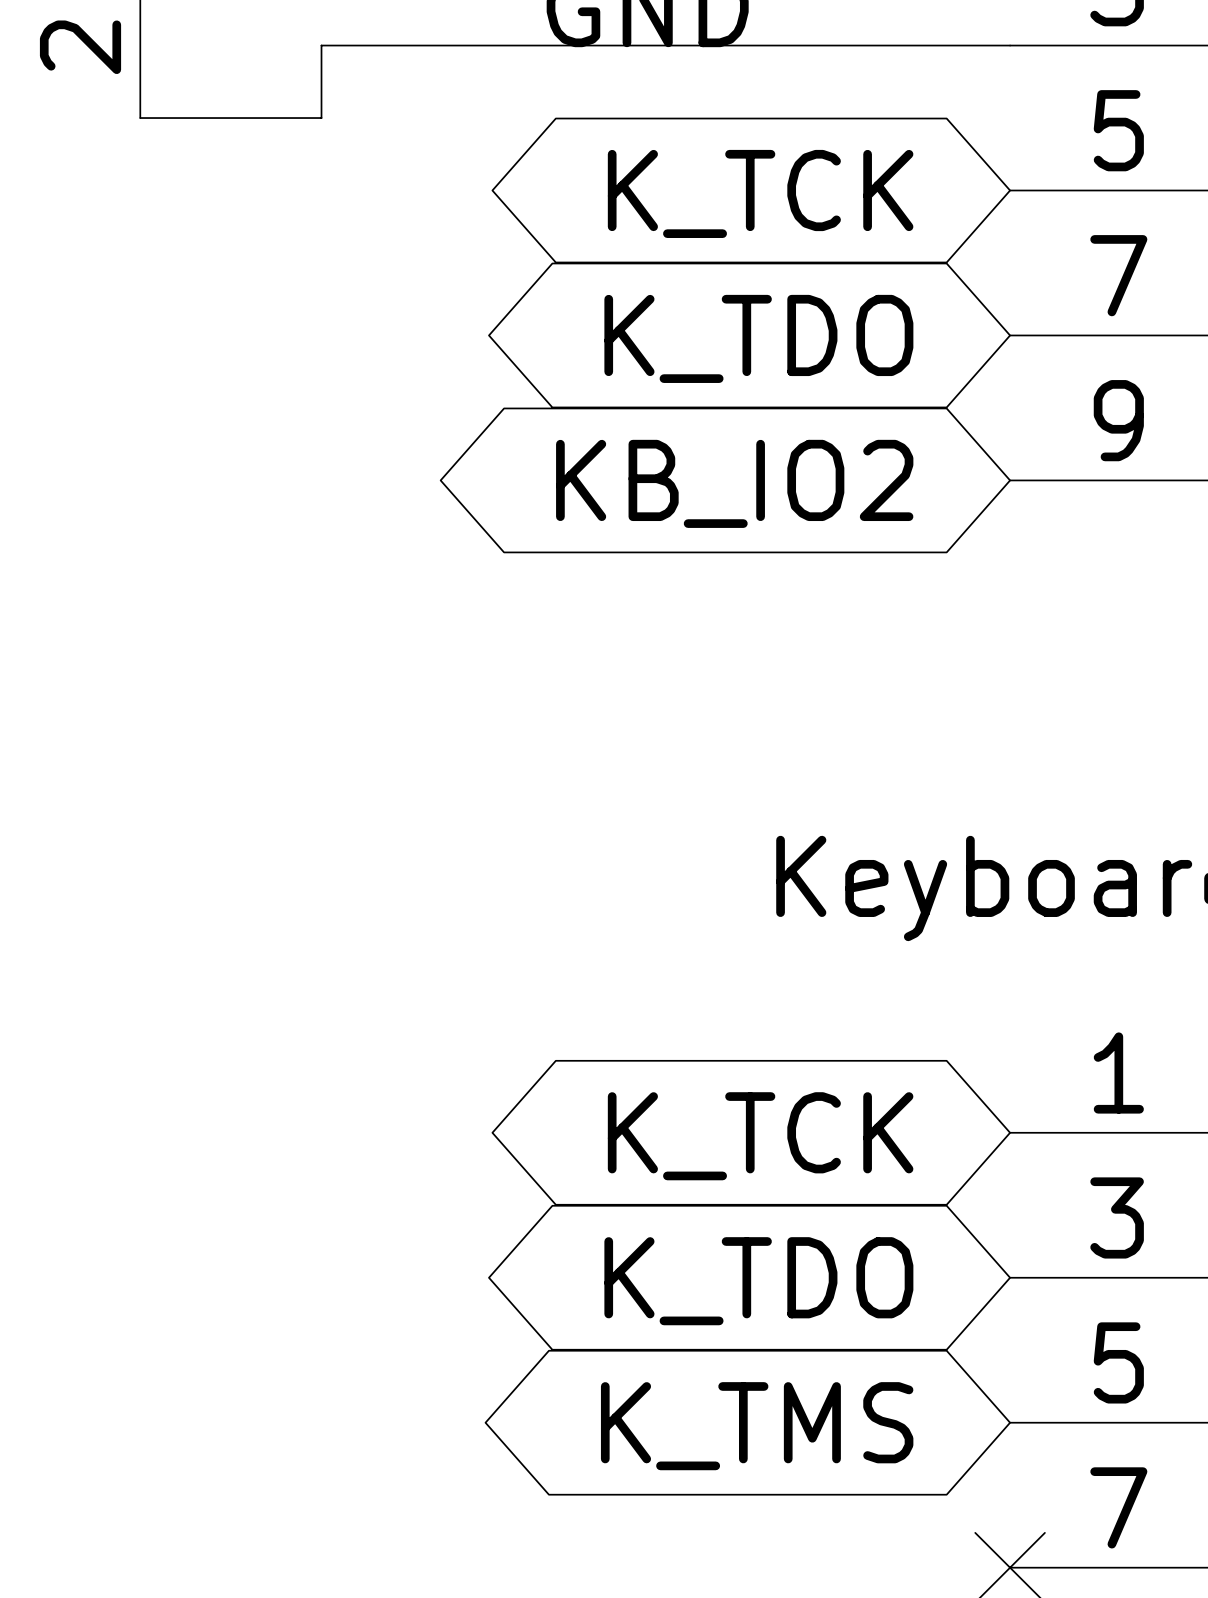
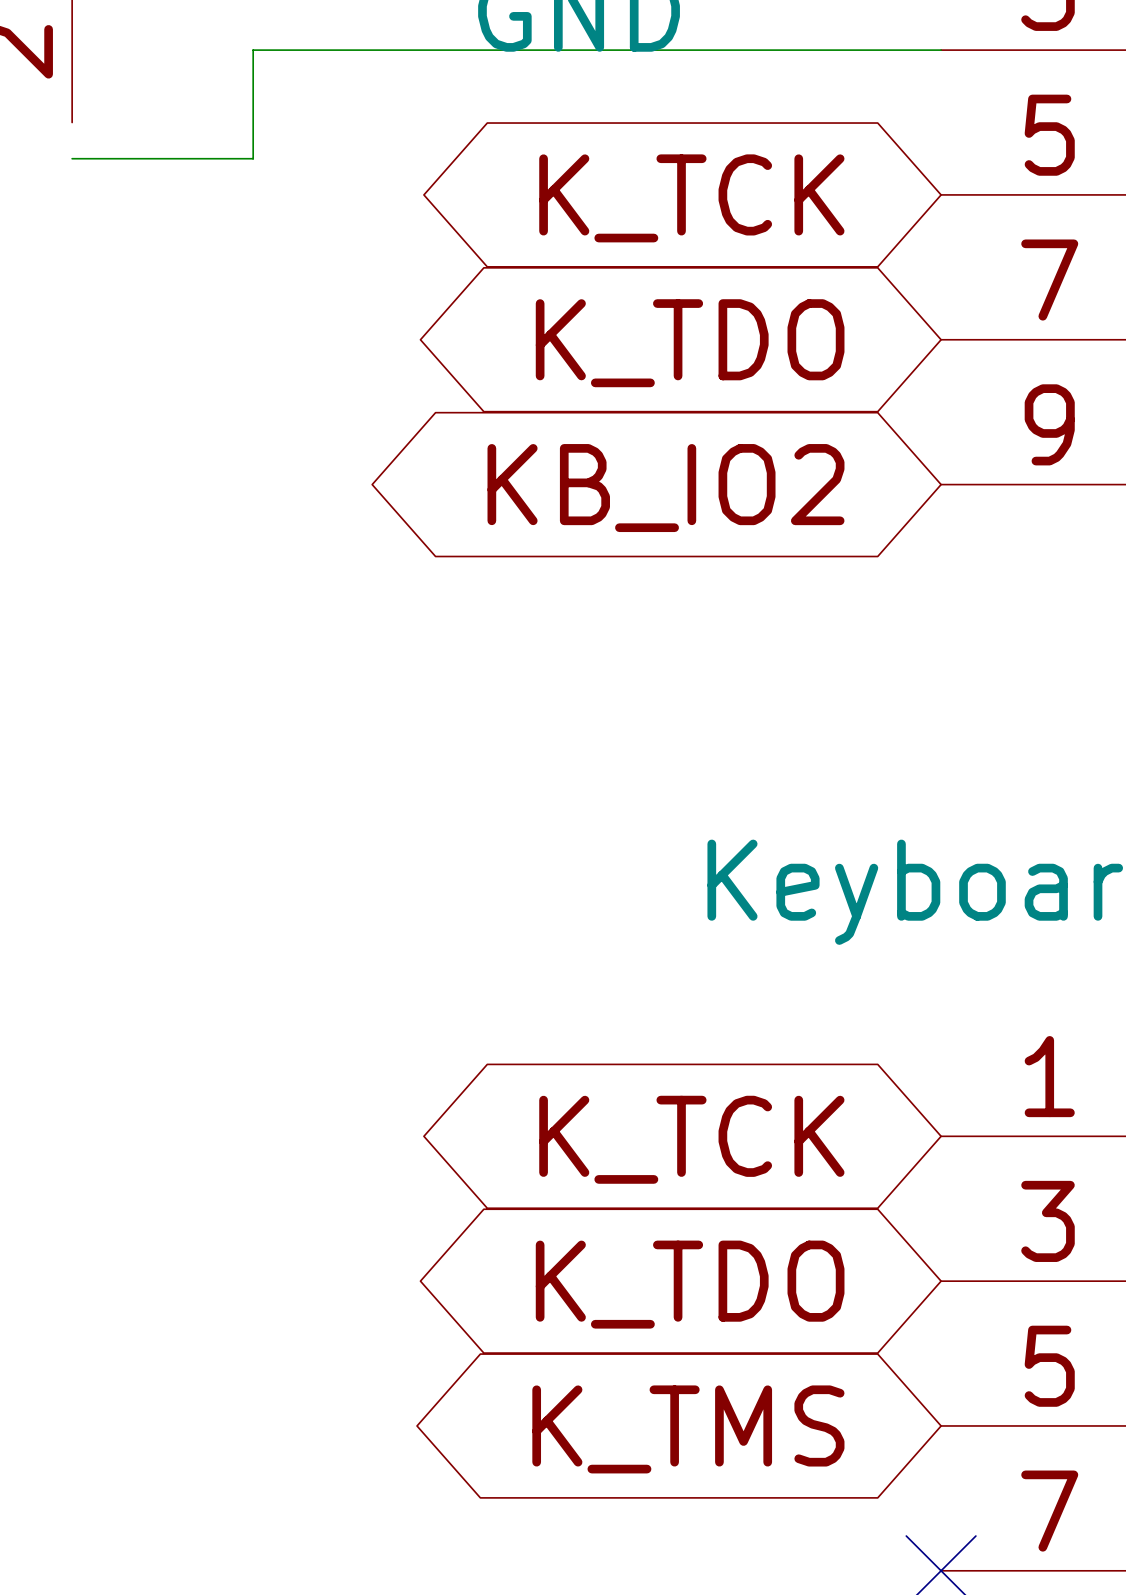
wire: (140, 118) (321, 118) -> (72, 158) (253, 158) (253, 122)

